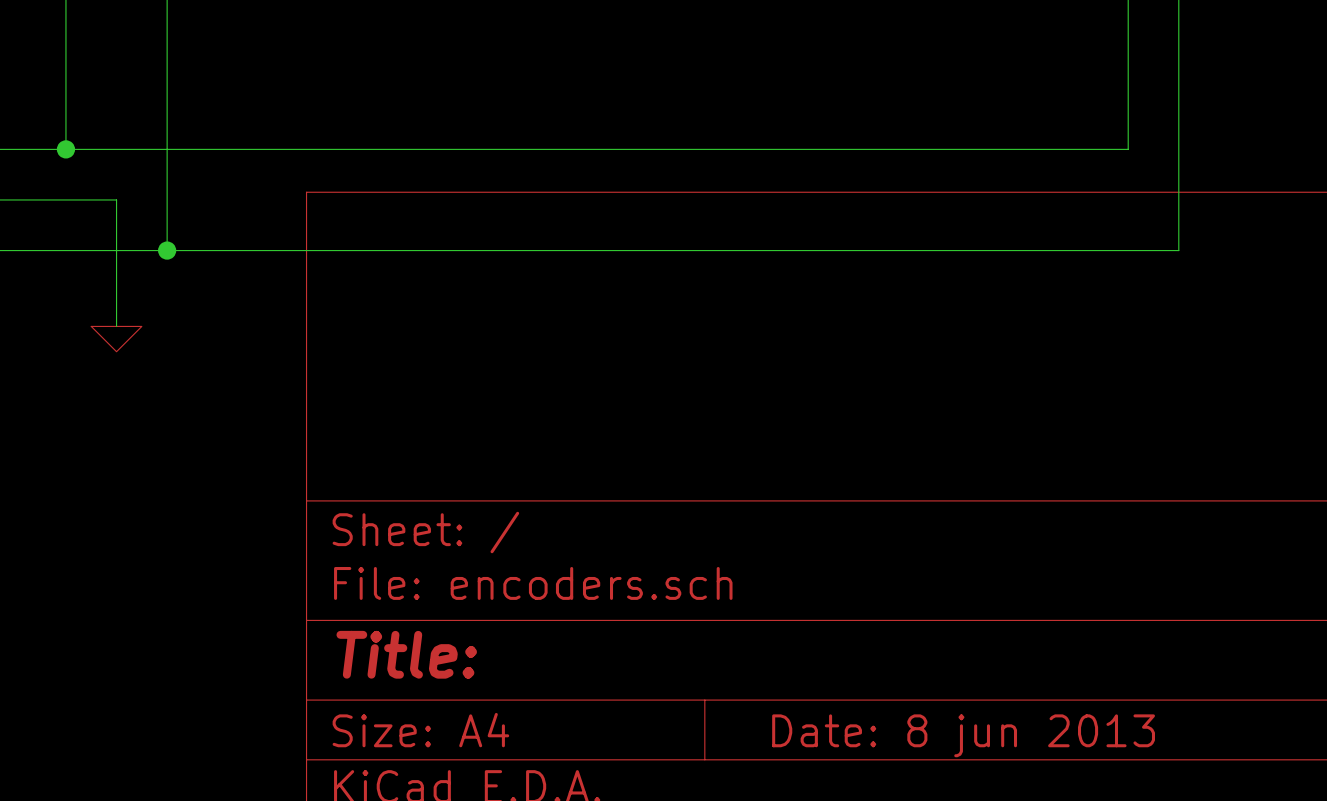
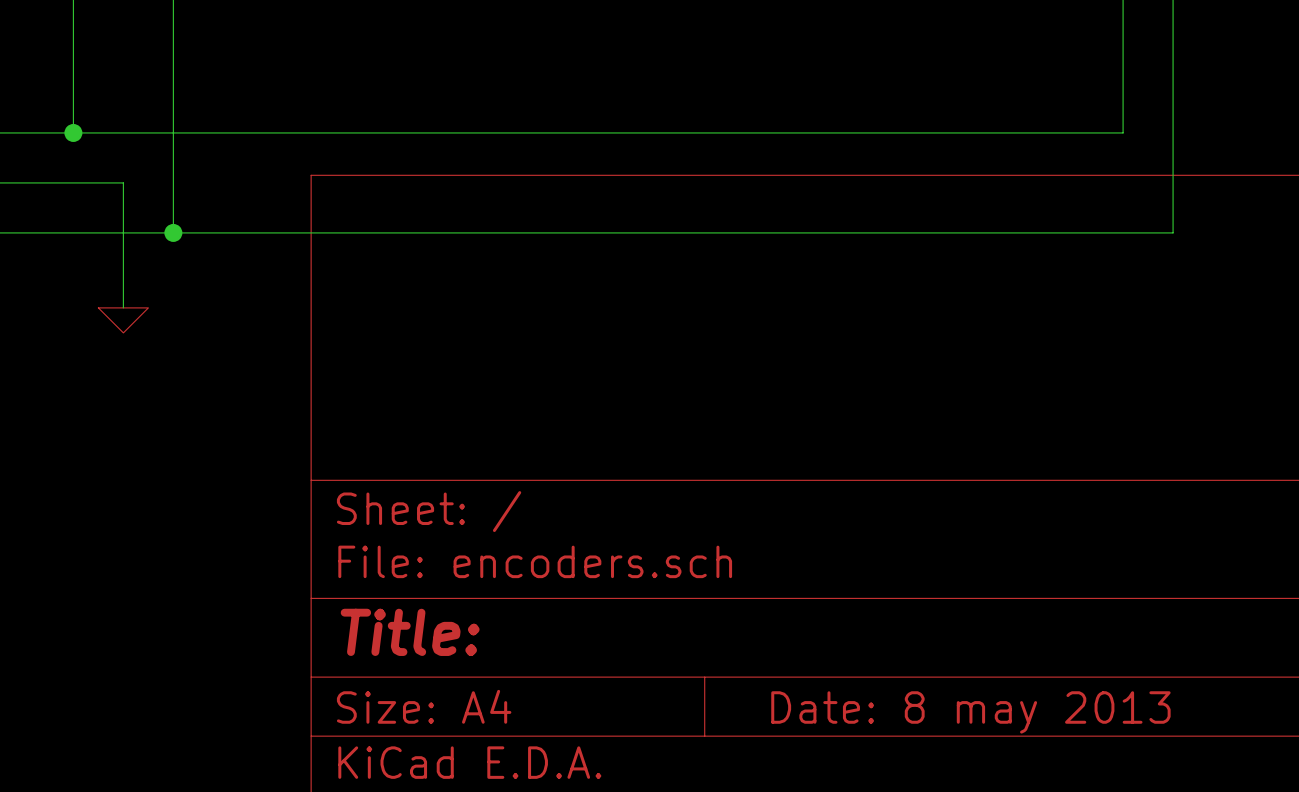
title block: Date: 8 jun 2013 (963, 735) -> Date: 8 may 2013 (970, 712)

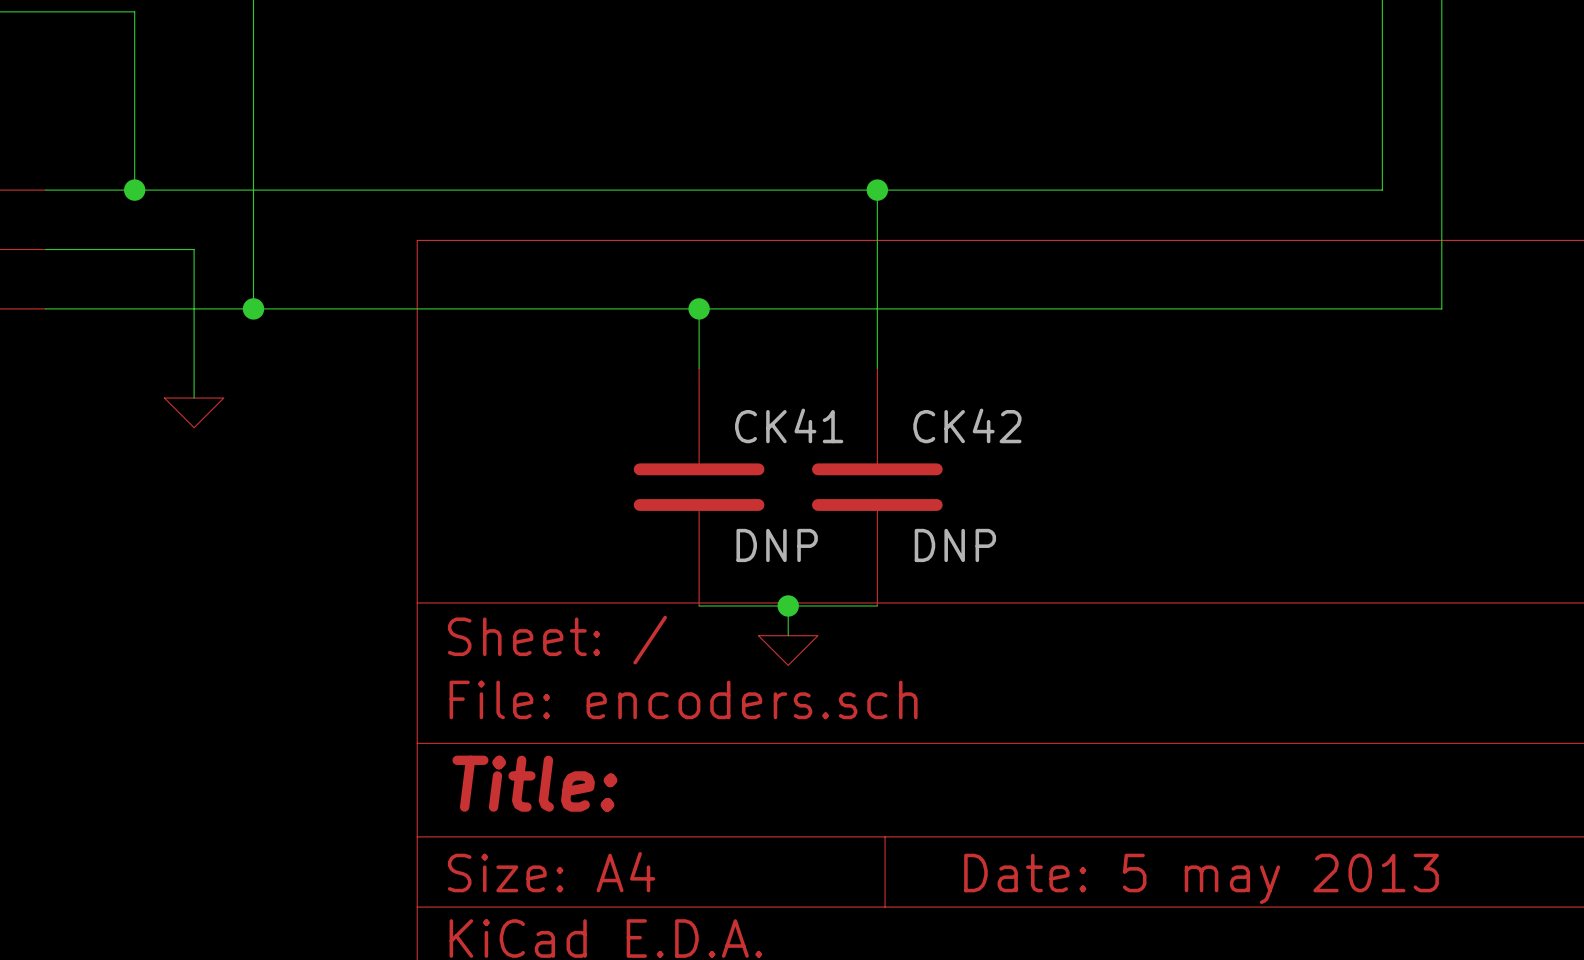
wire: none -> (877, 190) (877, 368)
junction: none -> (877, 190)
wire: none -> (699, 308) (699, 368)
junction: none -> (699, 308)
CK41: none -> DNP (699, 487)
CK42: none -> DNP (877, 487)
wire: none -> (699, 605) (877, 605)
wire: none -> (788, 605) (788, 635)
junction: none -> (788, 605)
power symbol: none -> (788, 650)
title block: Date: 8 may 2013 (970, 712) -> Date: 5 may 2013 (1201, 878)

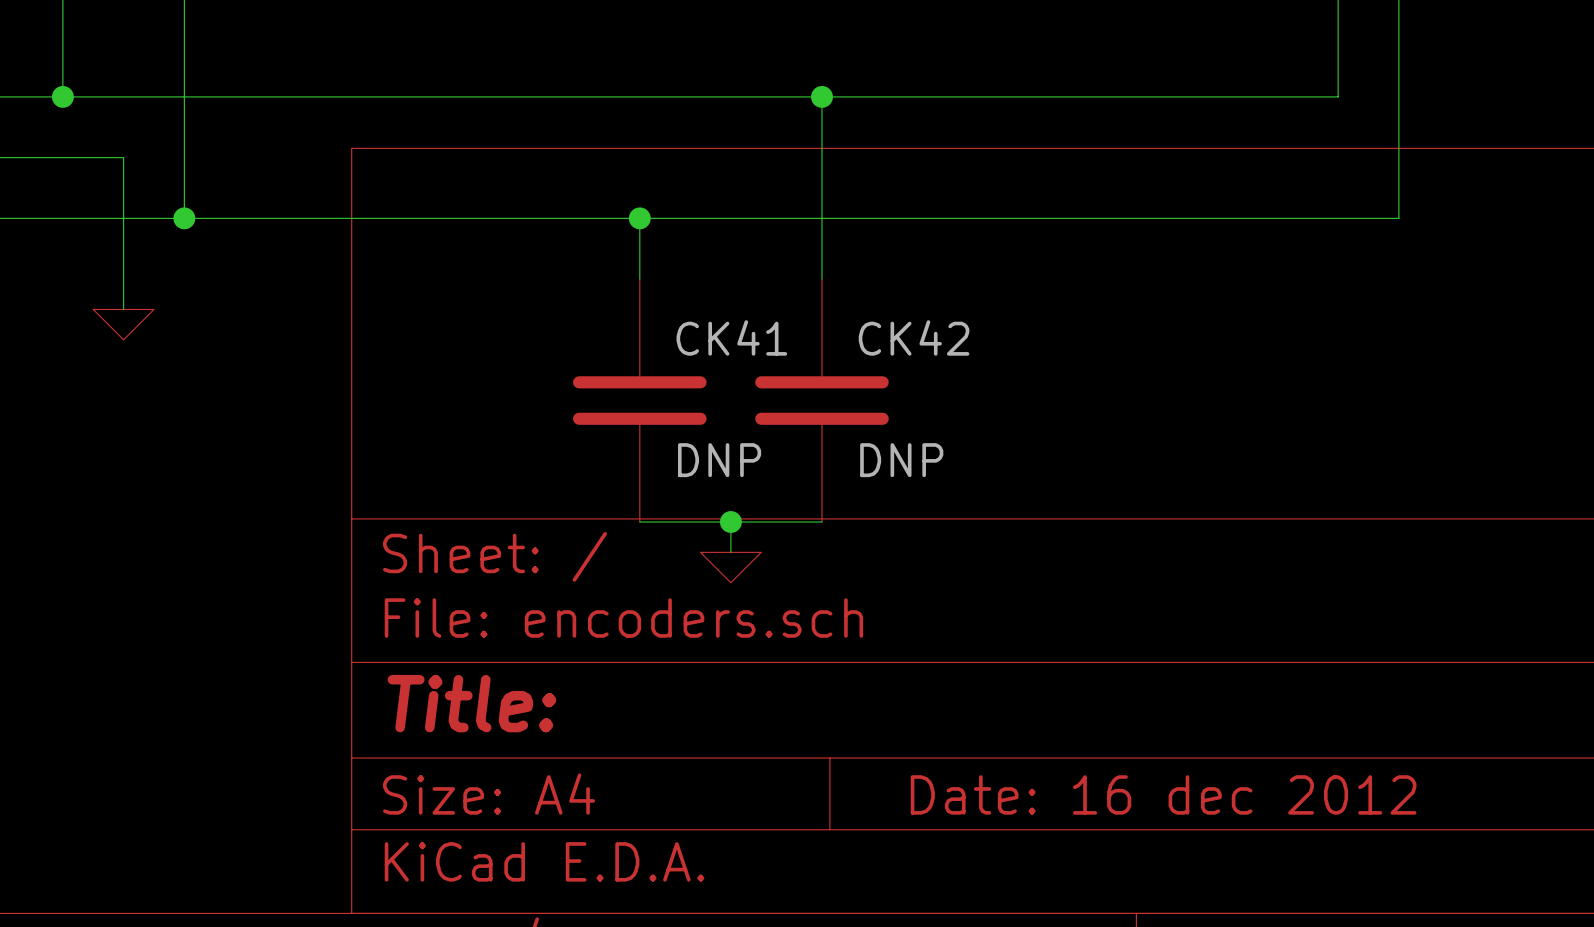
title block: Date: 5 may 2013 (1201, 878) -> Date: 16 dec 2012 (1163, 794)

